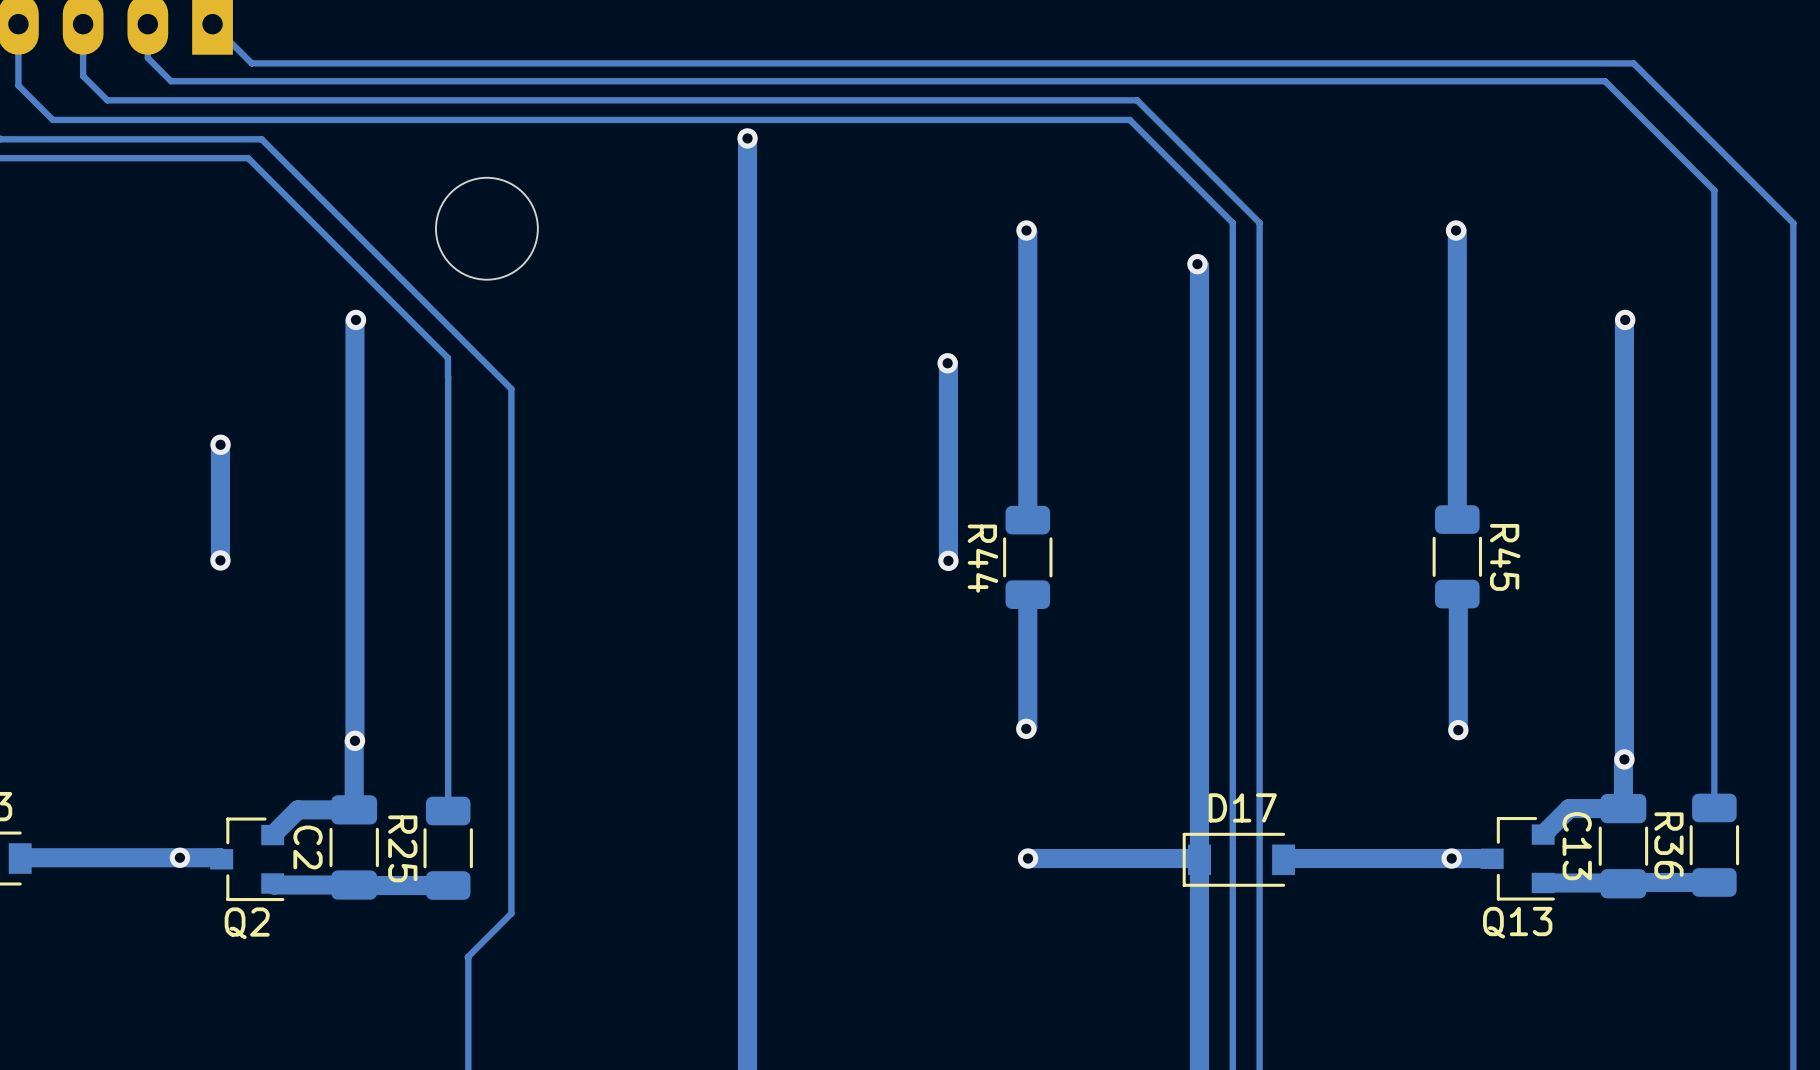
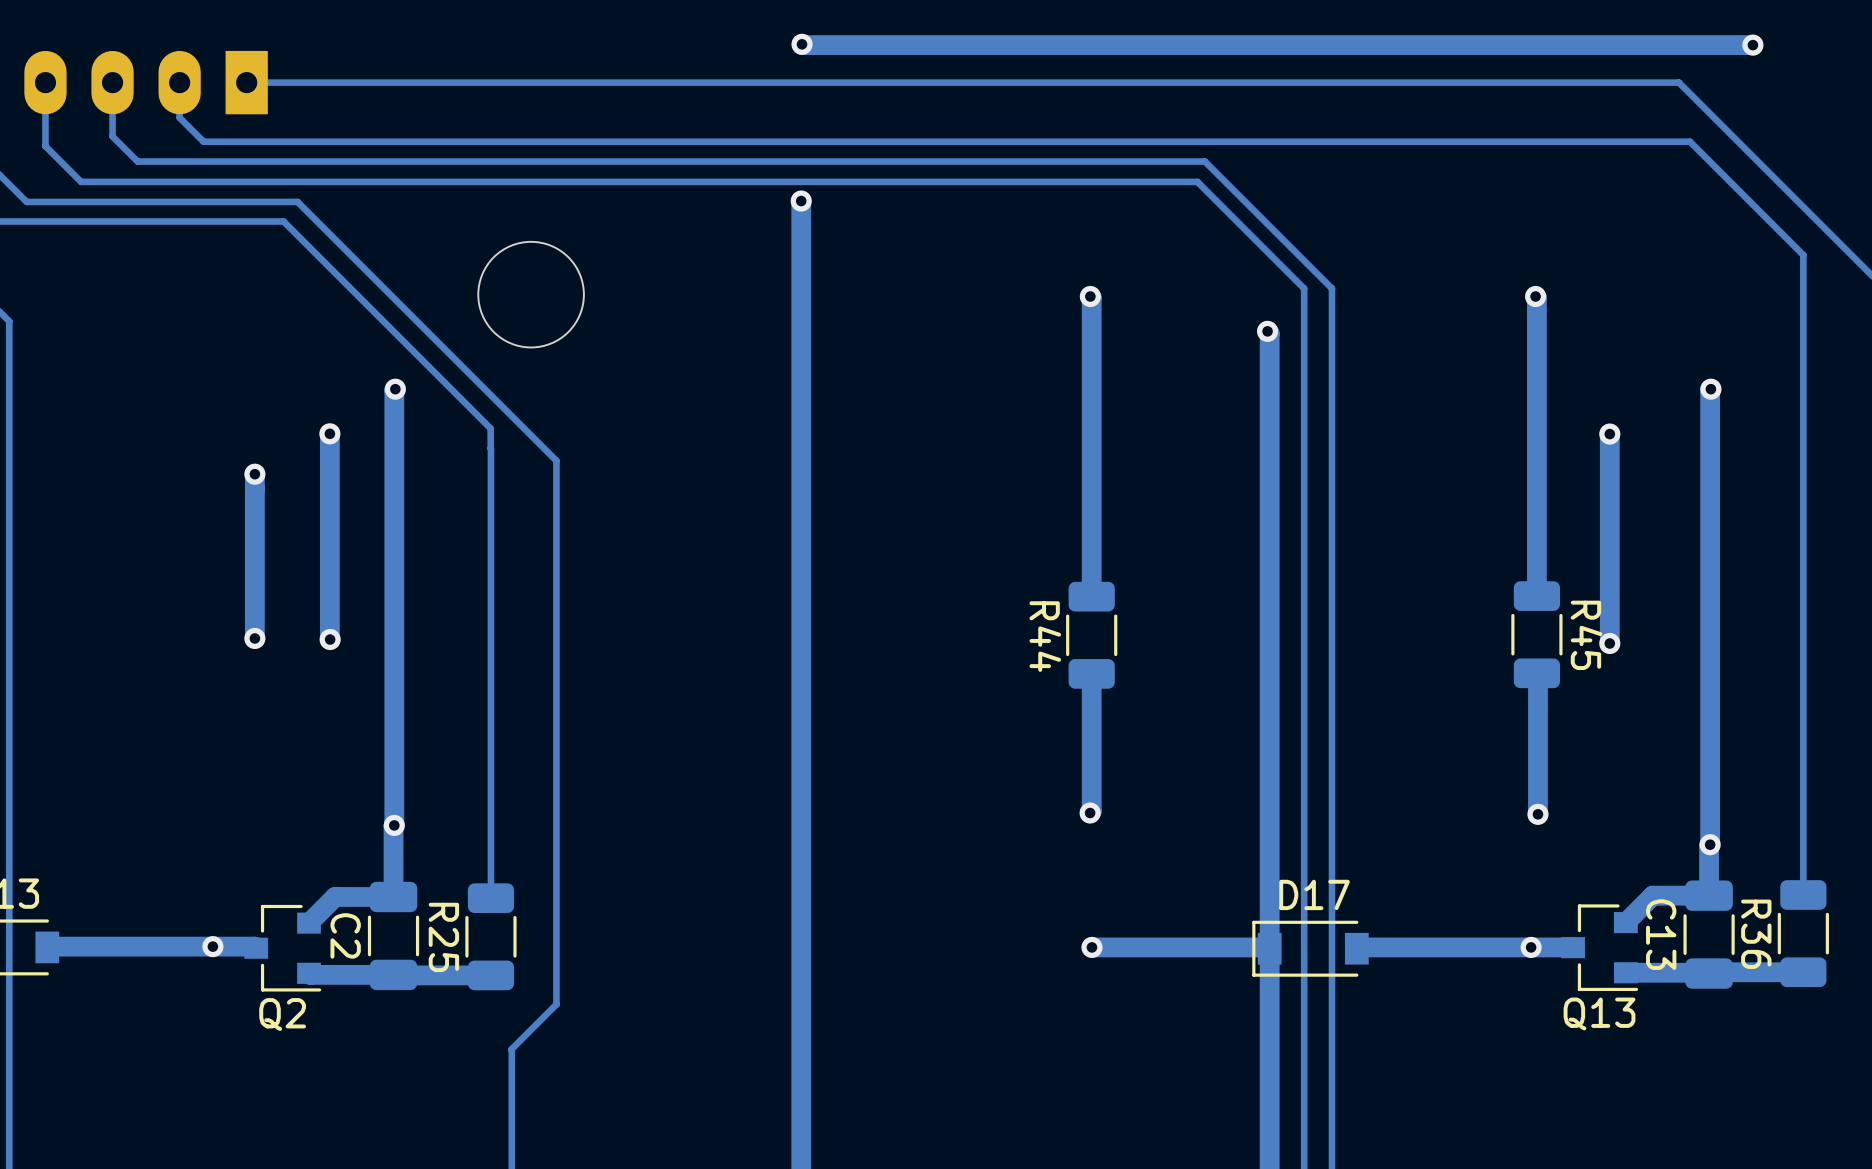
track: (212, 24) (251, 63) (1633, 63) -> (246, 82) (1678, 82) (1719, 123)
track: none -> (329, 433) (329, 639)
via: none -> (329, 433)
track: (947, 363) (948, 560) -> none
via: (947, 363) -> none
track: none -> (1609, 434) (1609, 643)
via: none -> (1609, 434)
track: none -> (254, 474) (254, 518)
via position: (220, 444) -> (254, 474)
via: (948, 560) -> none
via: none -> (330, 639)
via: none -> (1609, 643)

